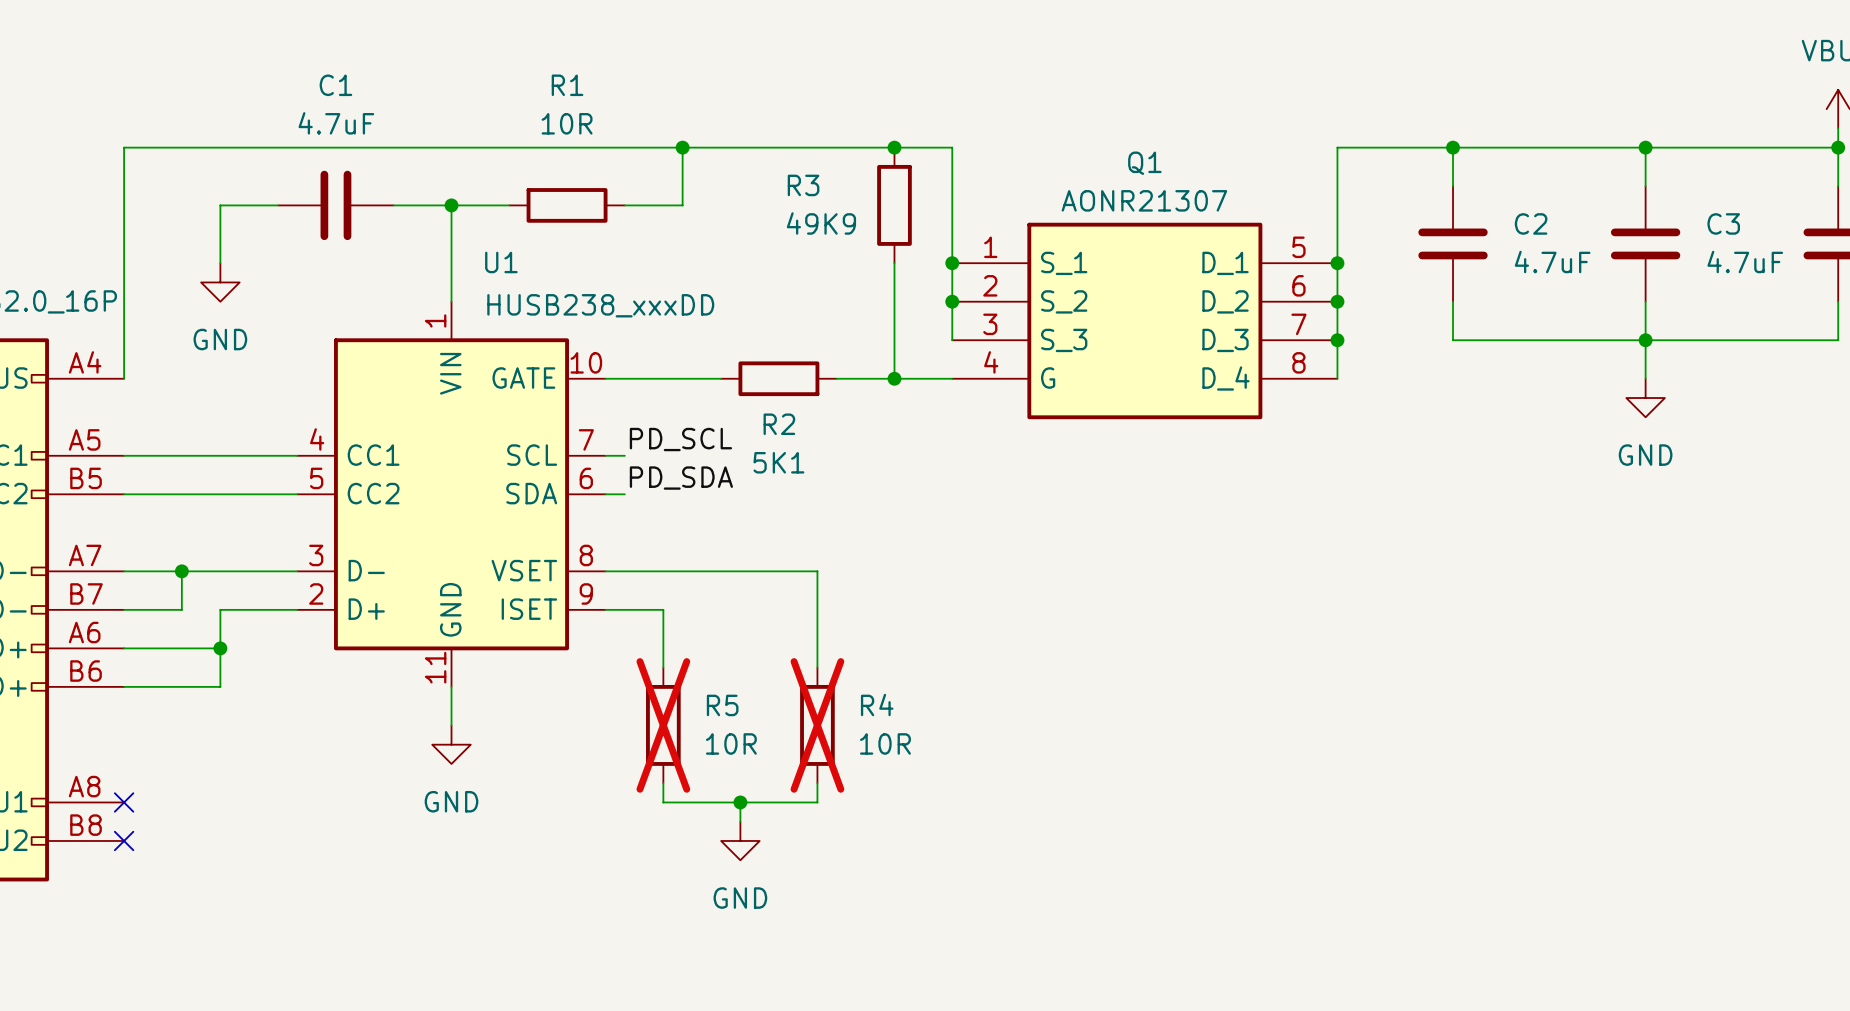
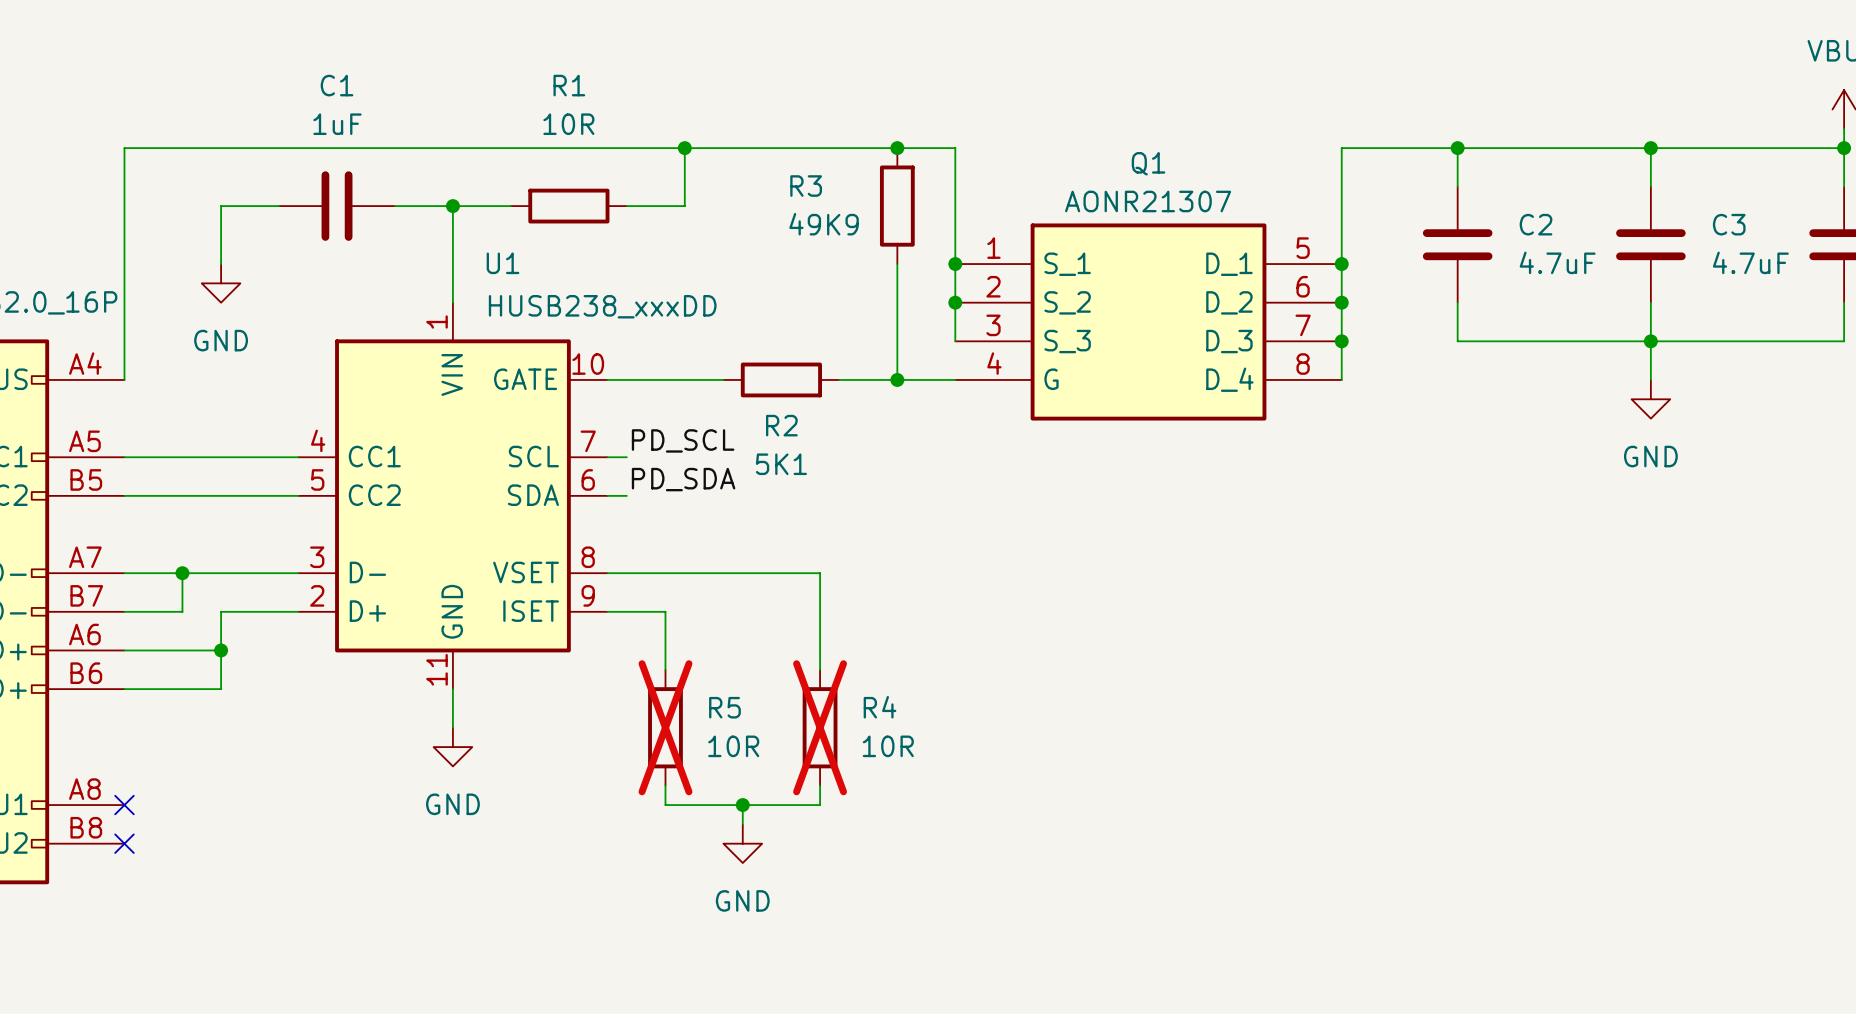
C1 value: 4.7uF (336, 123) -> 1uF (337, 124)

